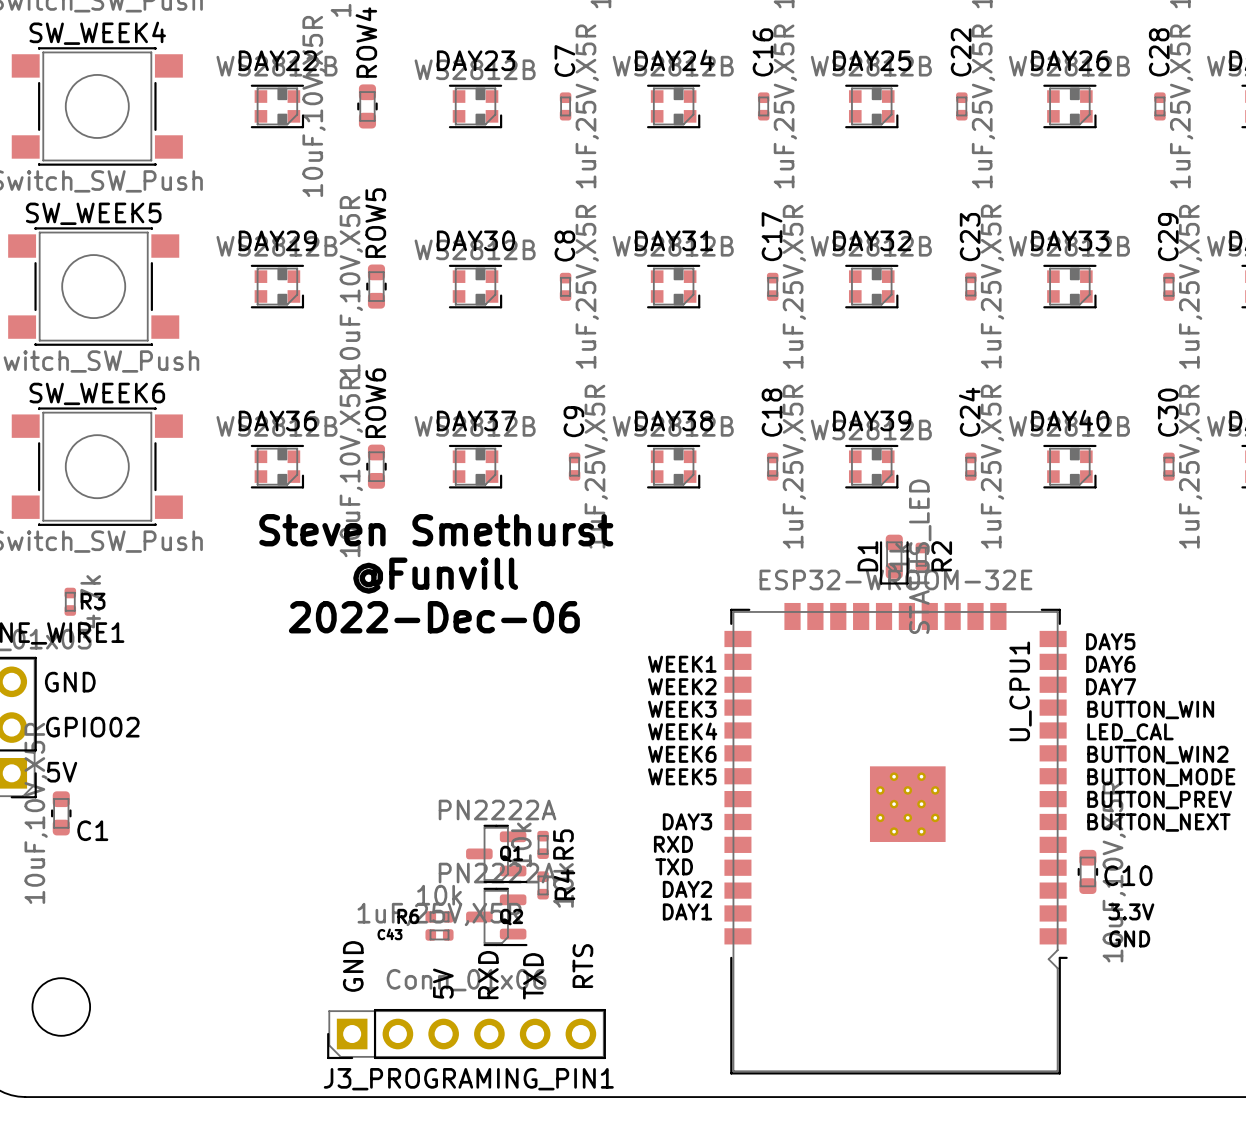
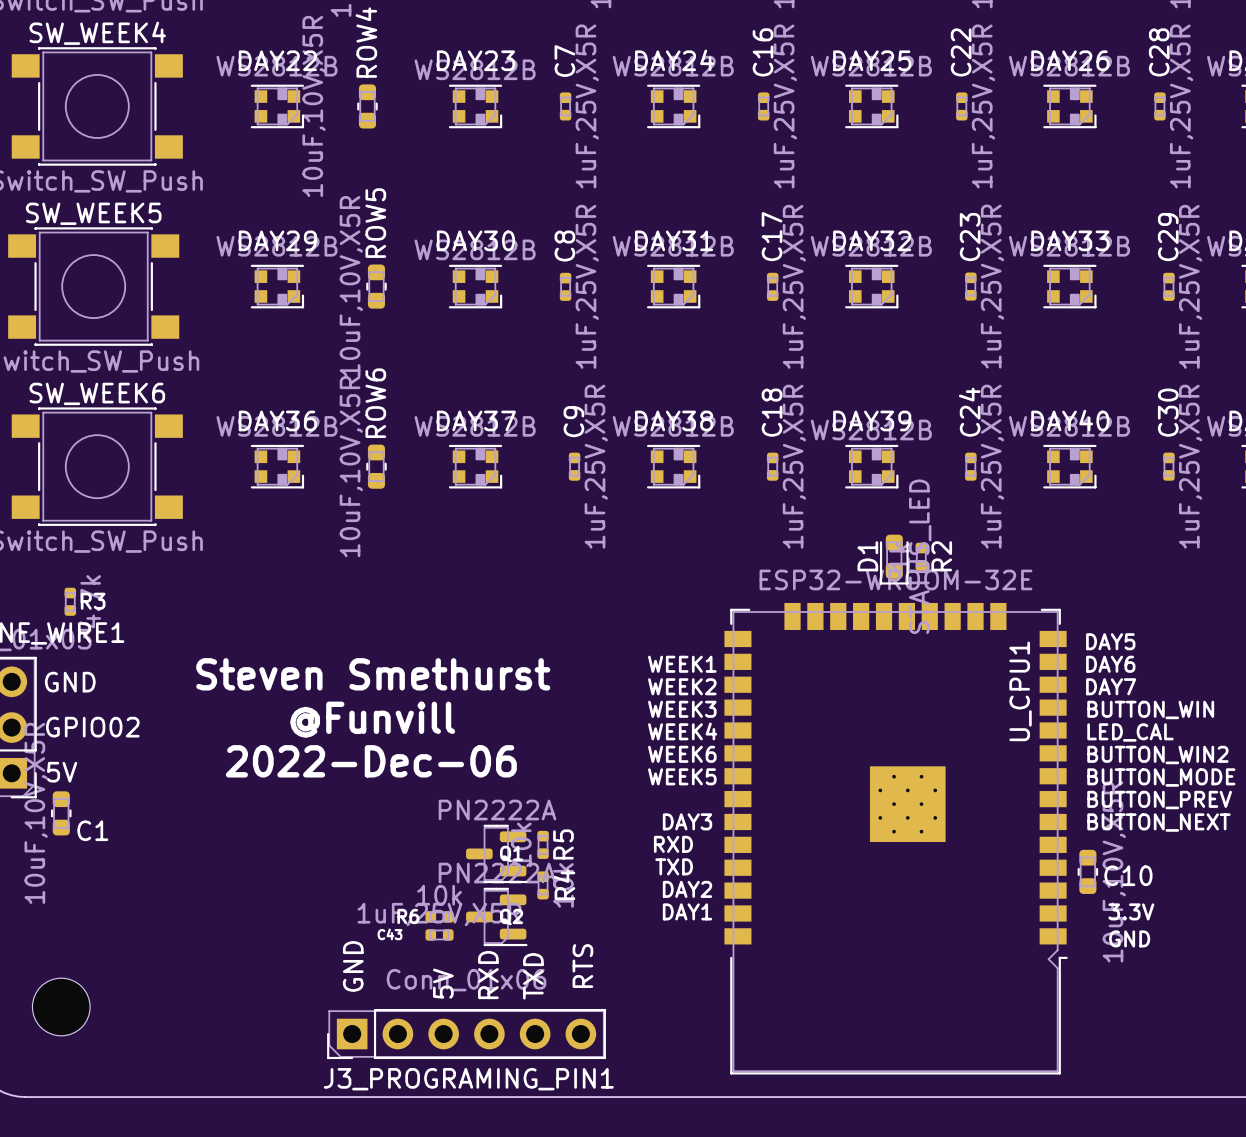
text position: Steven Smethurst (436, 530) -> Steven Smethurst (373, 674)
text position: @Funvill (435, 575) -> @Funvill (372, 719)
text position: 2022-Dec-06 (434, 617) -> 2022-Dec-06 (371, 761)

